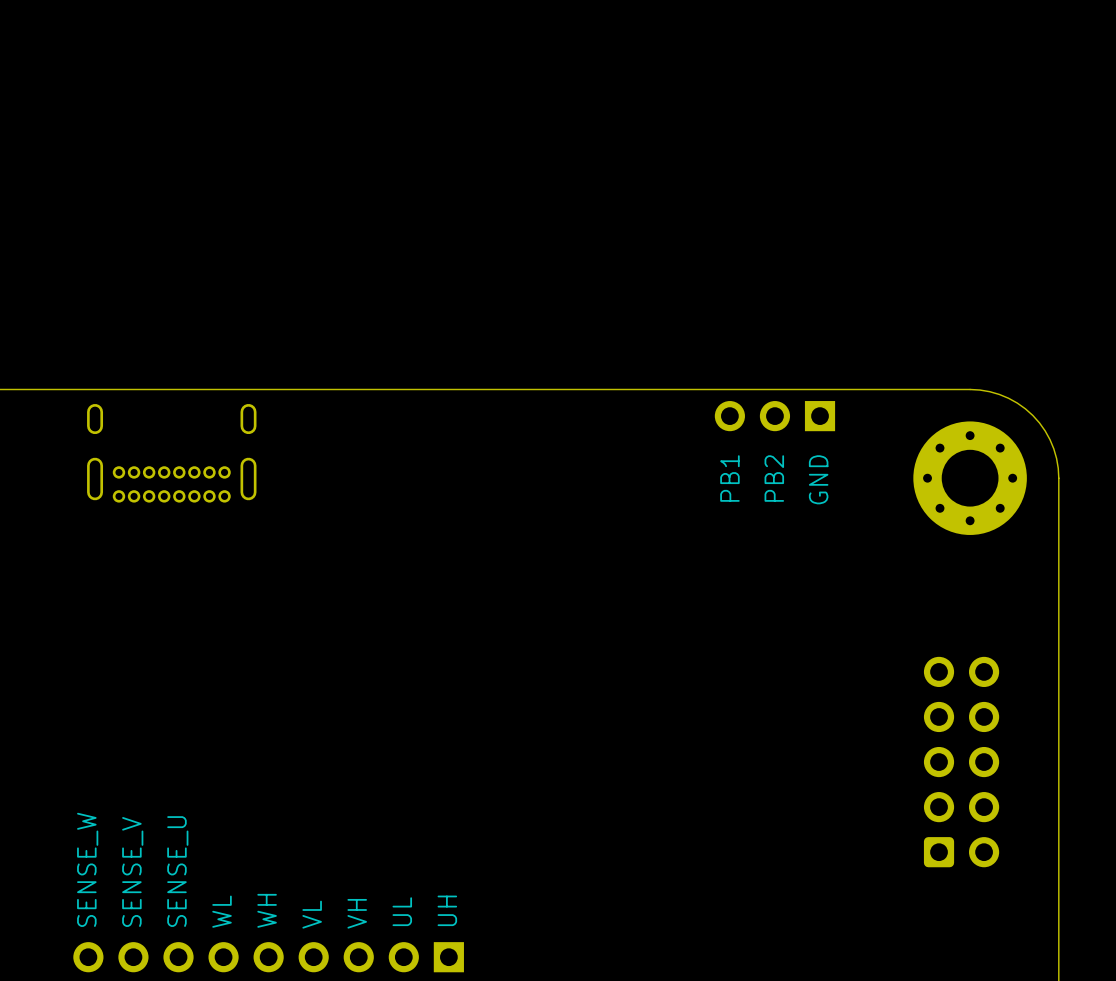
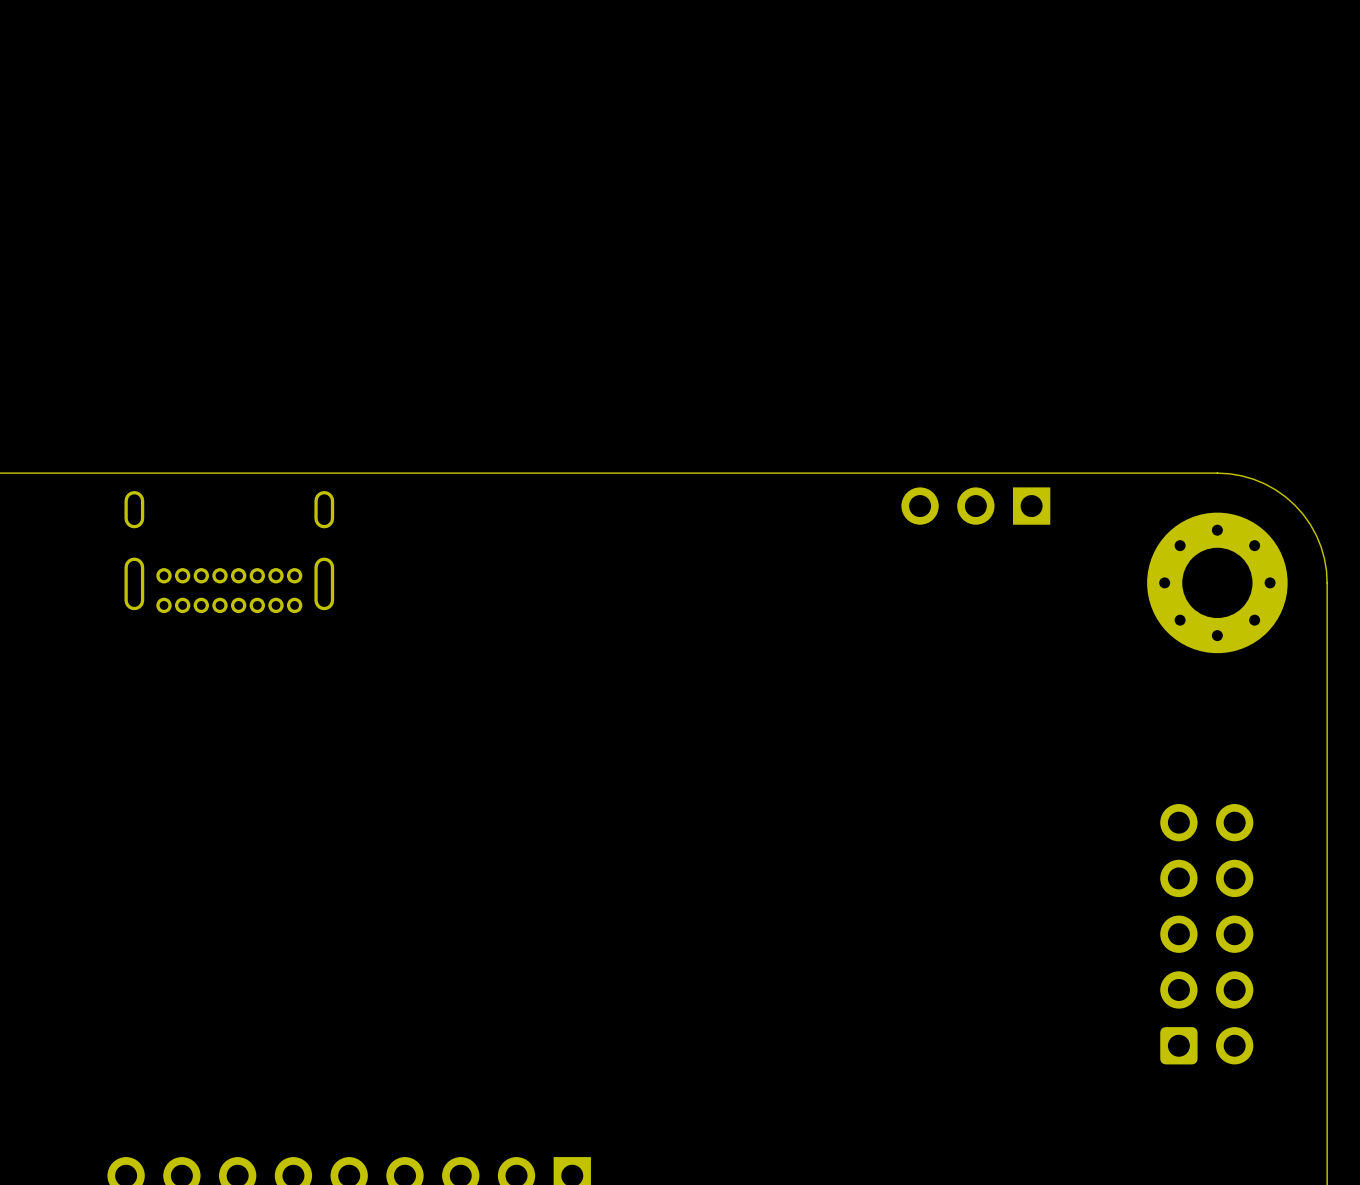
text: PB1 (729, 478) -> none
text: PB2 (774, 478) -> none
text: GND (818, 479) -> none
text: SENSE_W (87, 869) -> none
text: SENSE_V (132, 871) -> none
text: SENSE_U (177, 871) -> none
text: WH (267, 910) -> none
text: UH (447, 910) -> none
text: WL (222, 911) -> none
text: UL (402, 911) -> none
text: VH (357, 913) -> none
text: VL (312, 914) -> none

